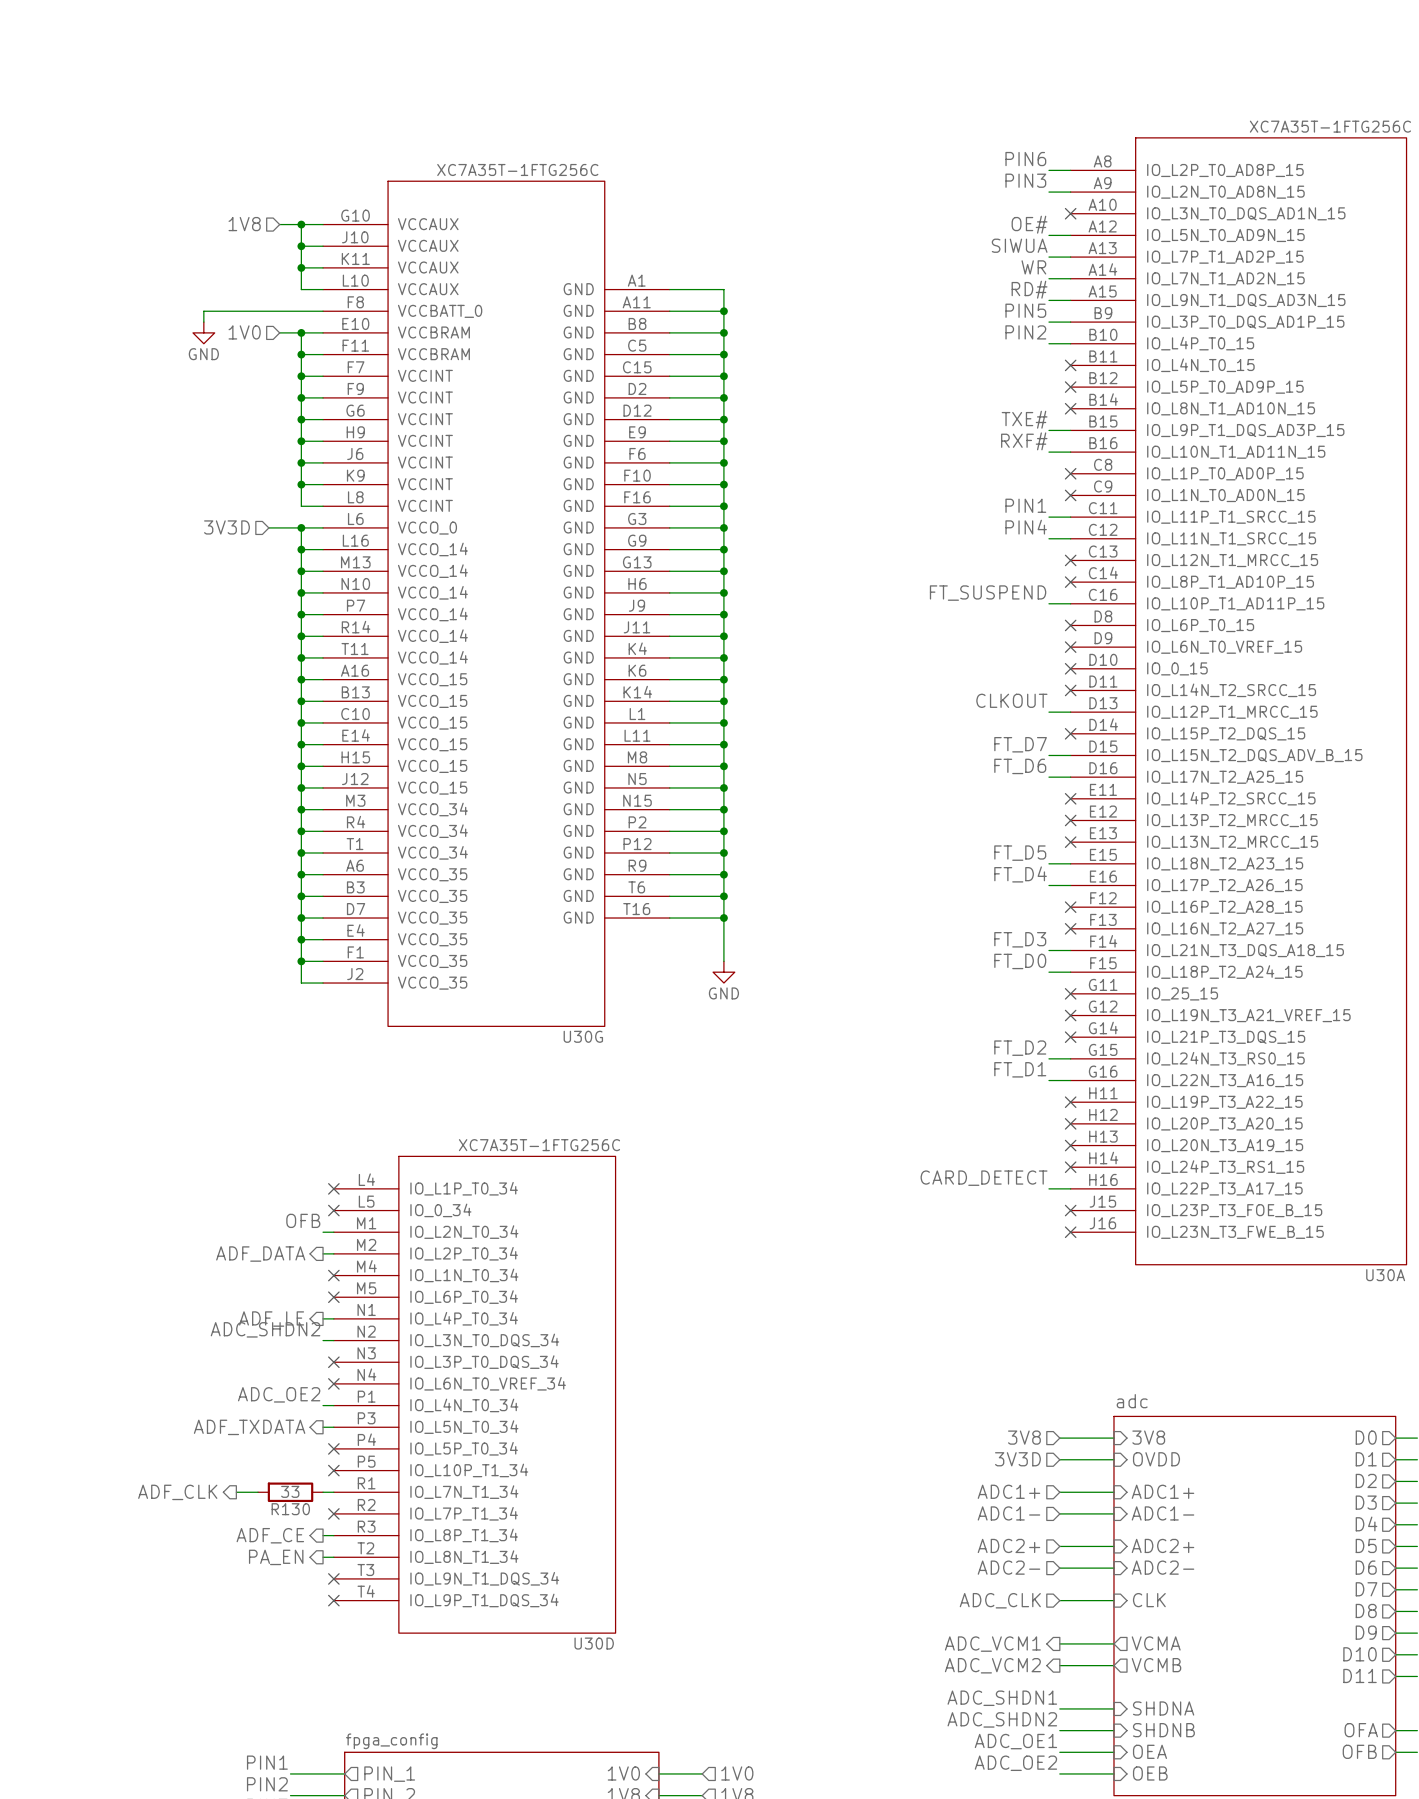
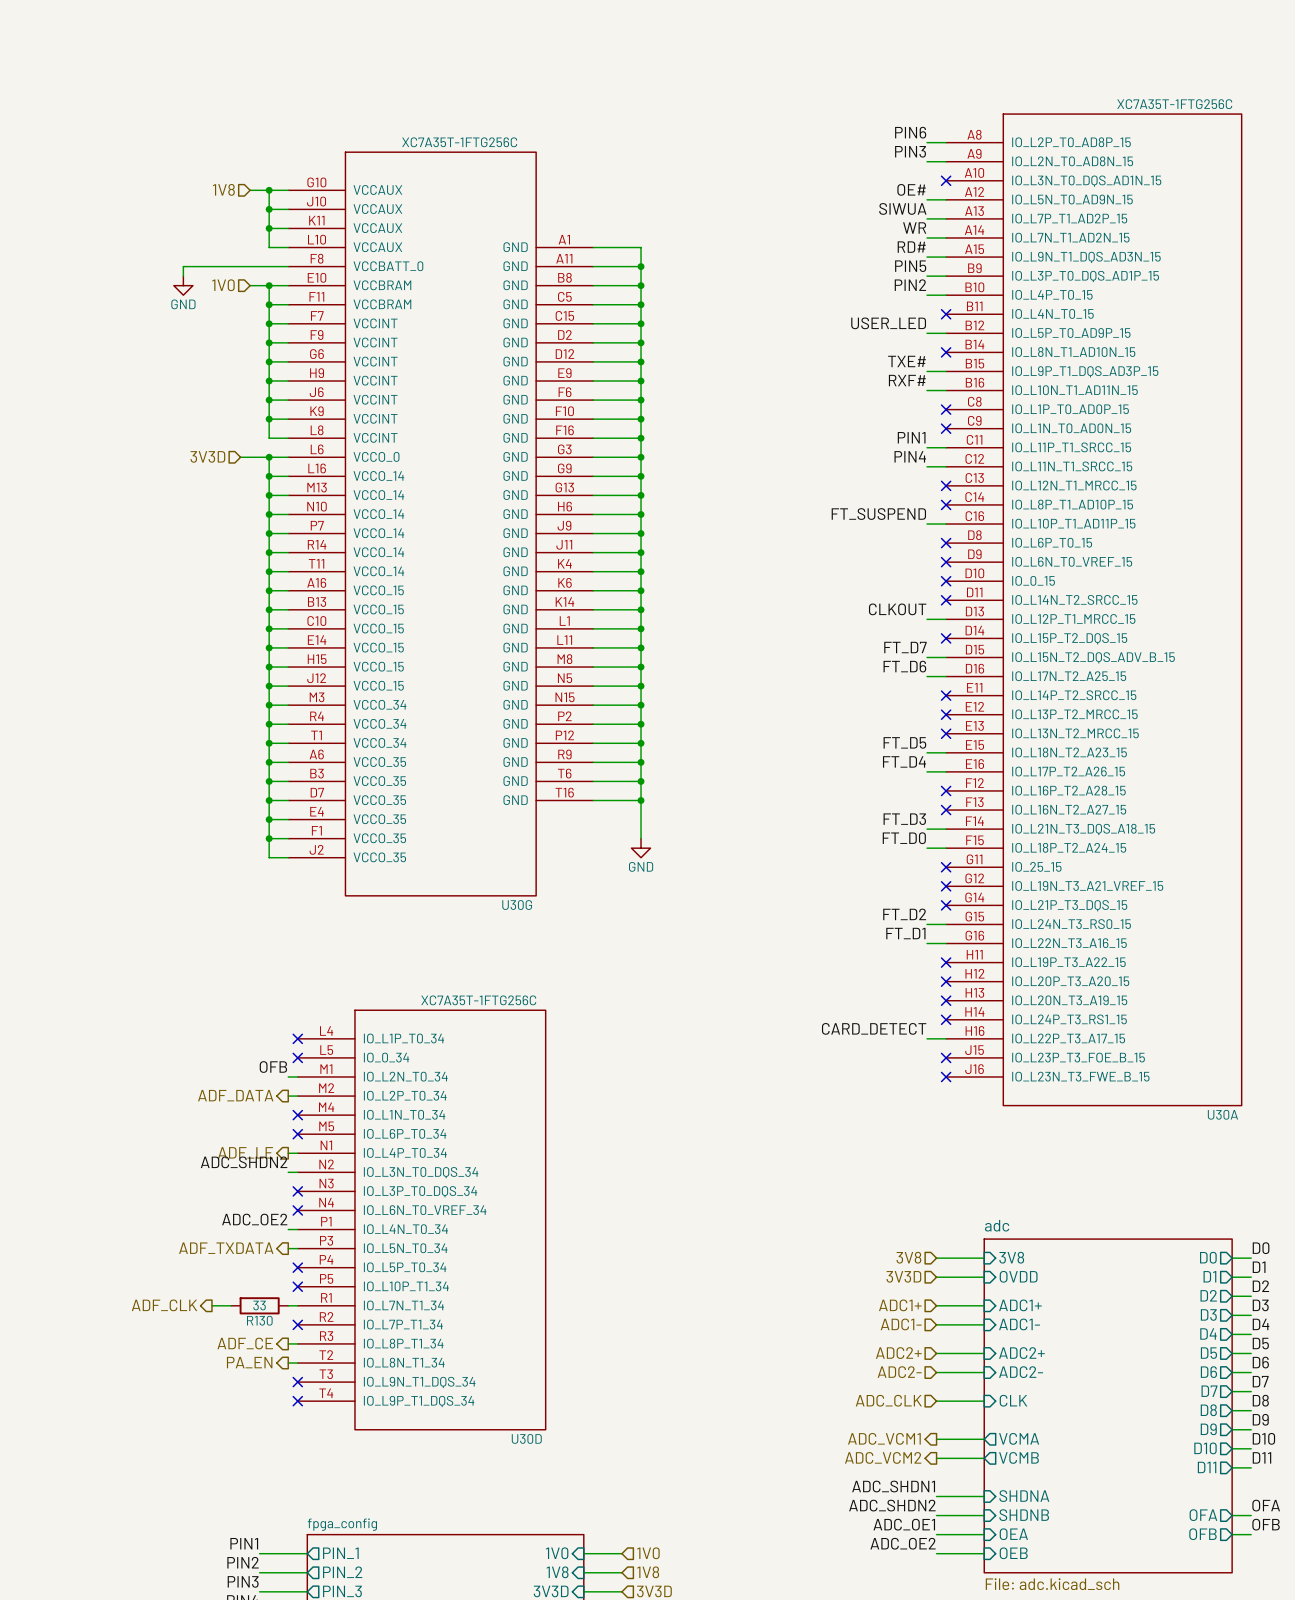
label: none -> USER_LED (888, 323)
wire: none -> (927, 333) (946, 333)
no-connect mark: (1070, 387) -> none

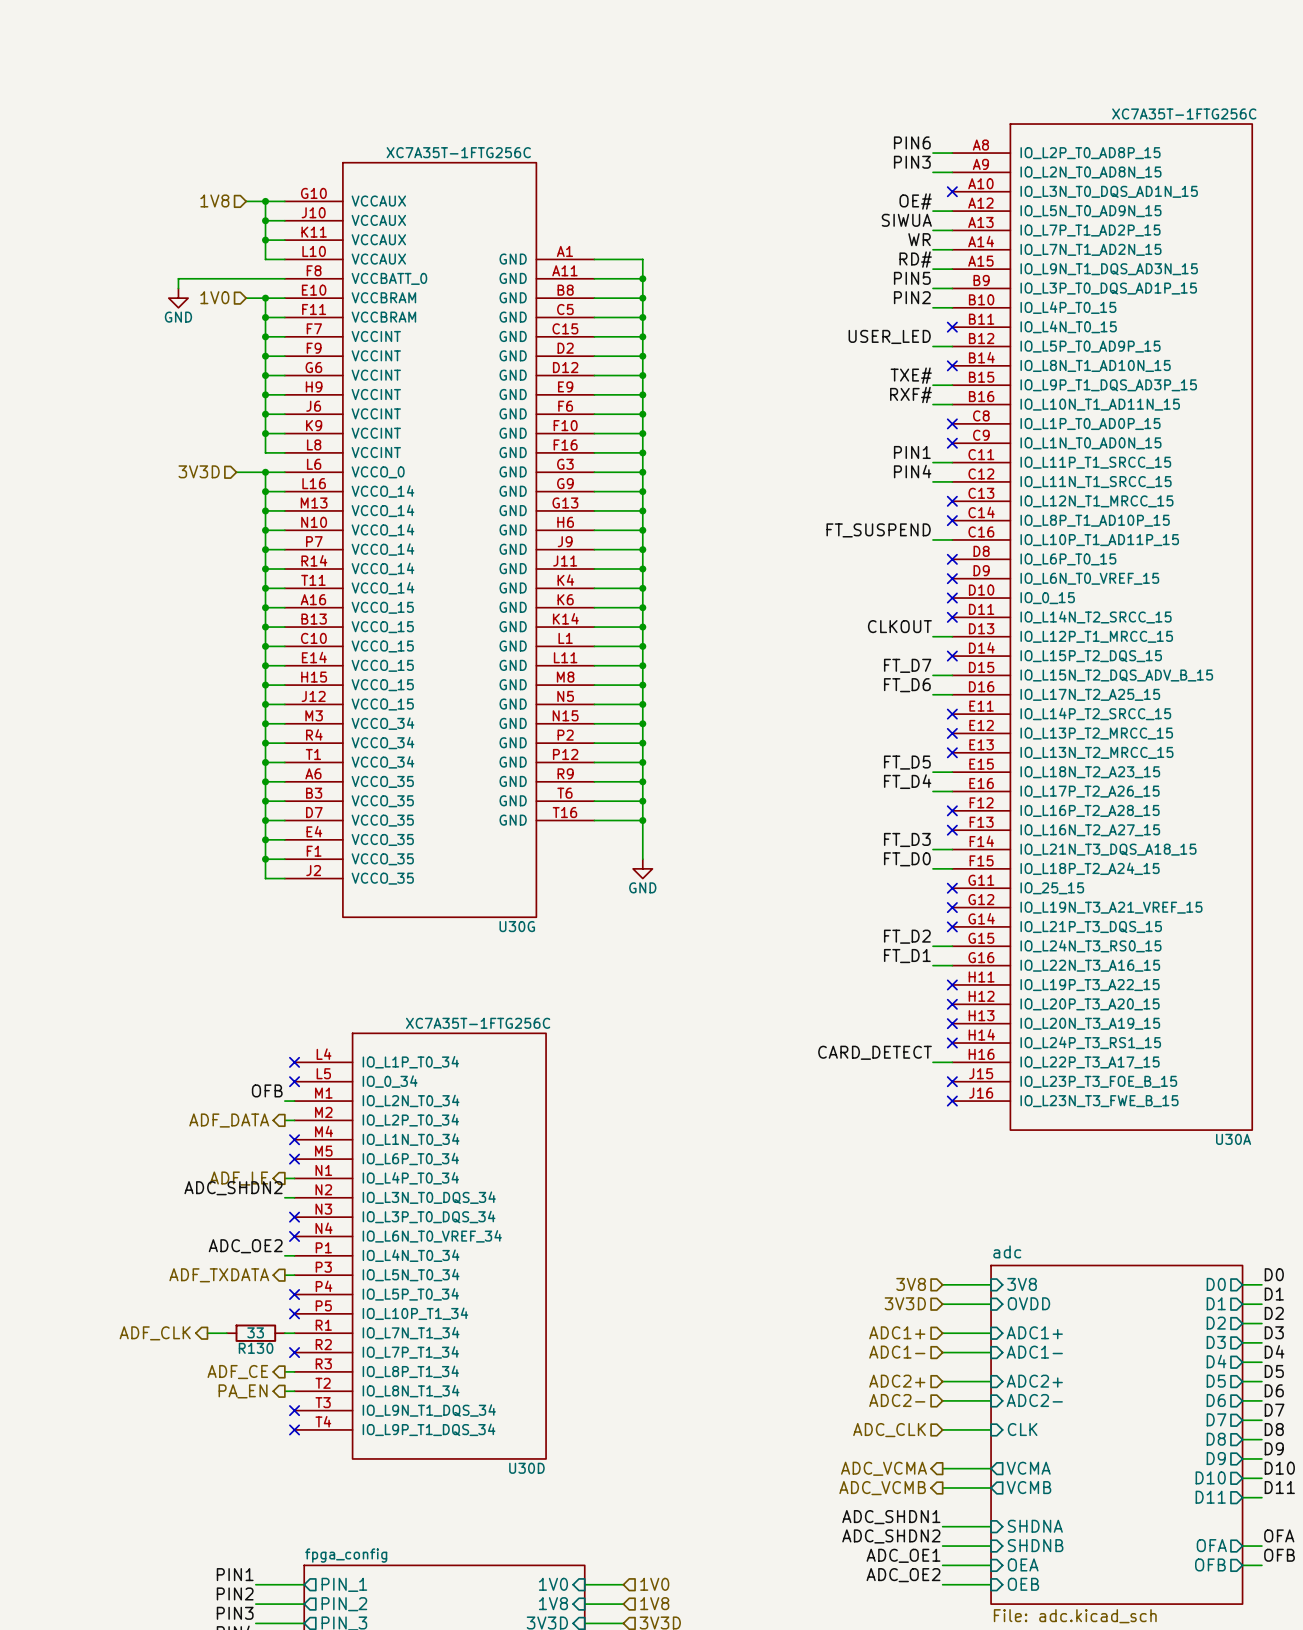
hierarchical label: ADC_VCM1 (884, 1438) -> ADC_VCMA (884, 1468)
hierarchical label: ADC_VCM2 (883, 1457) -> ADC_VCMB (882, 1488)

